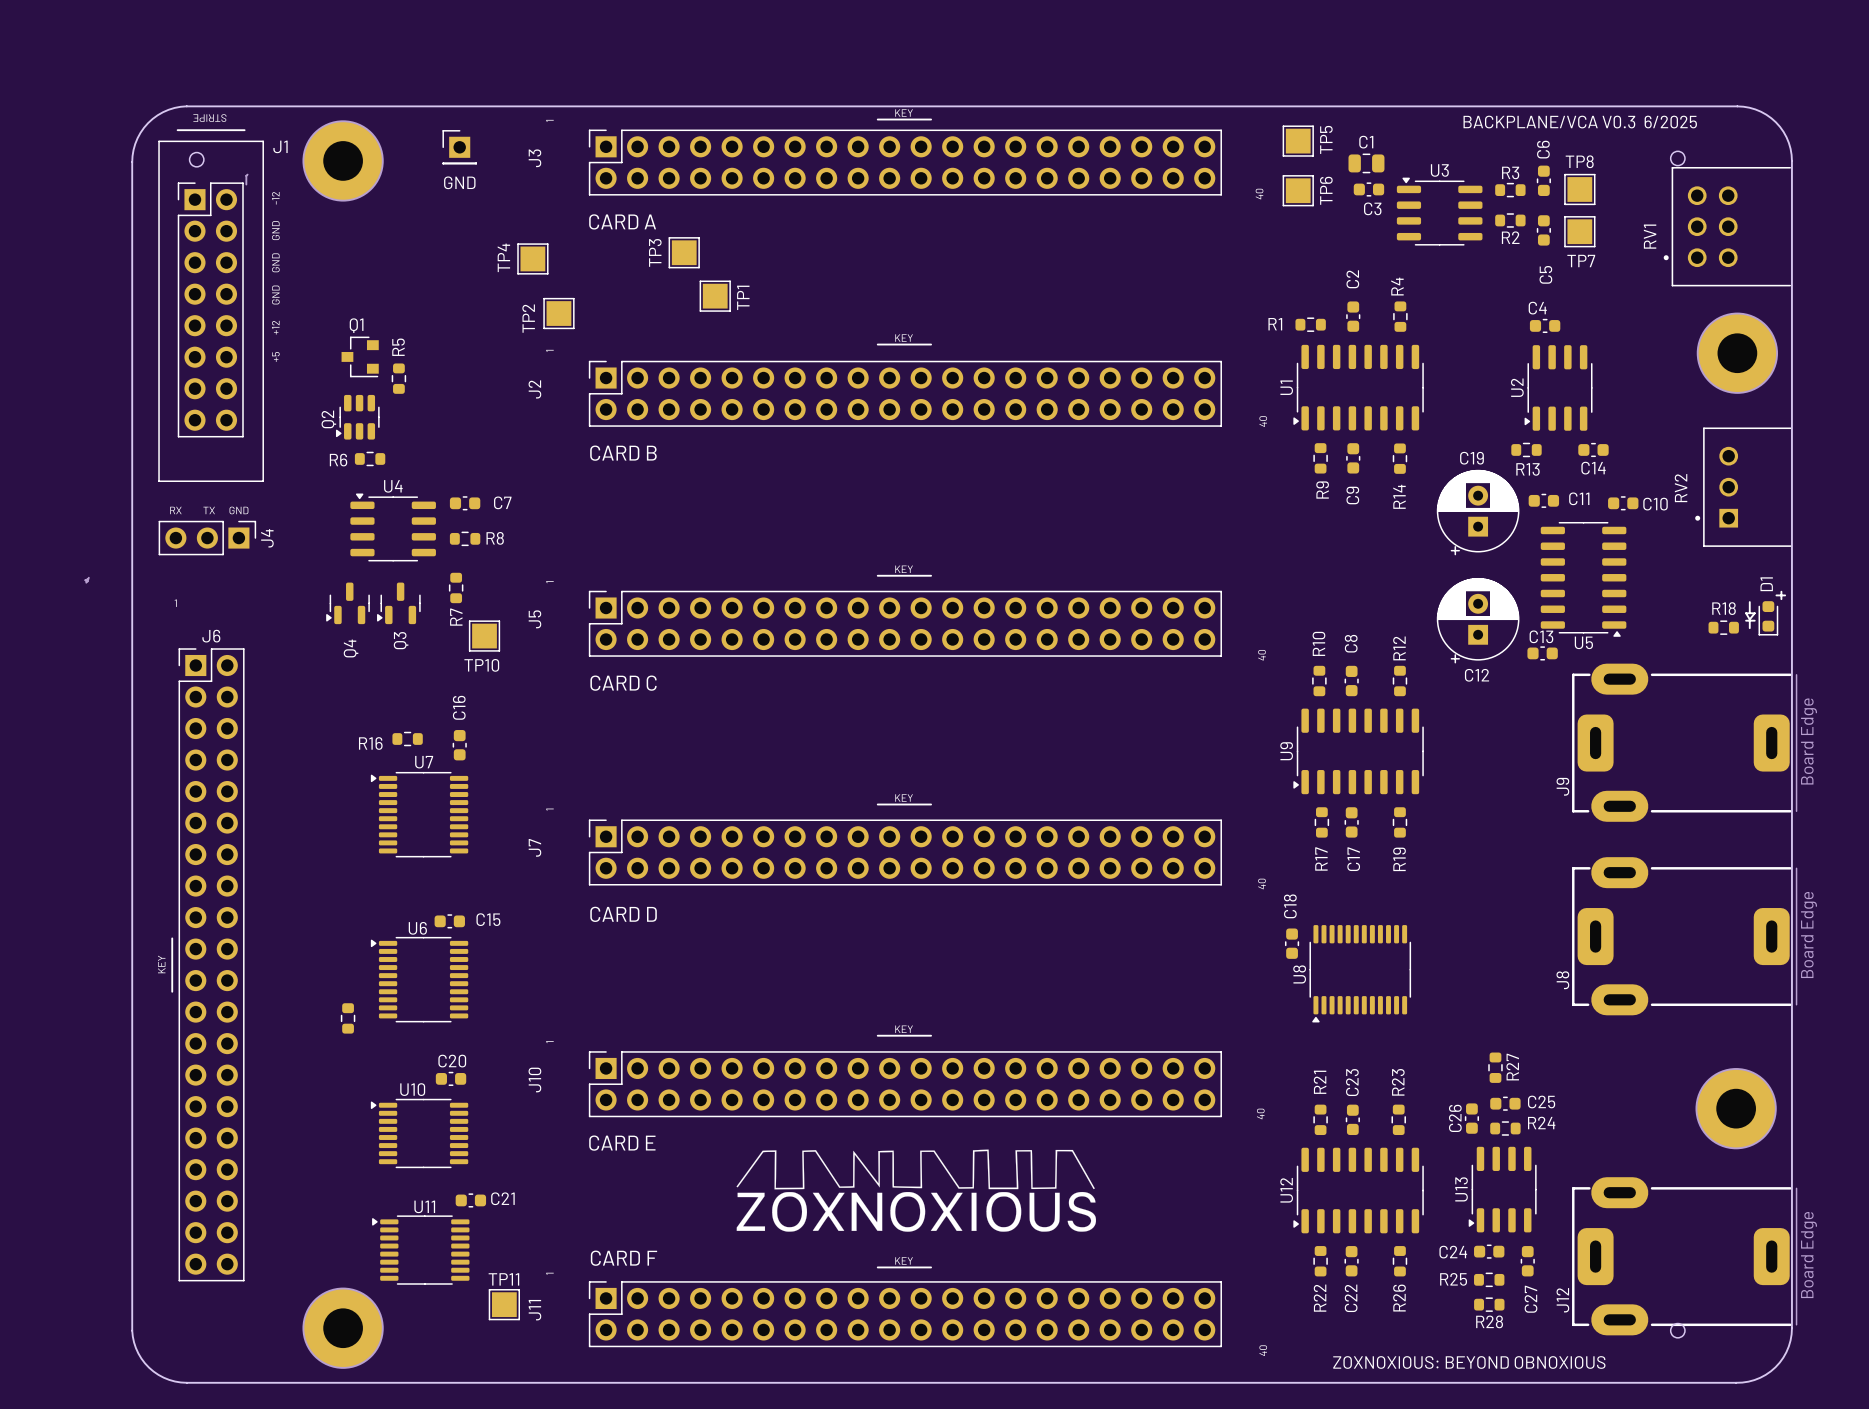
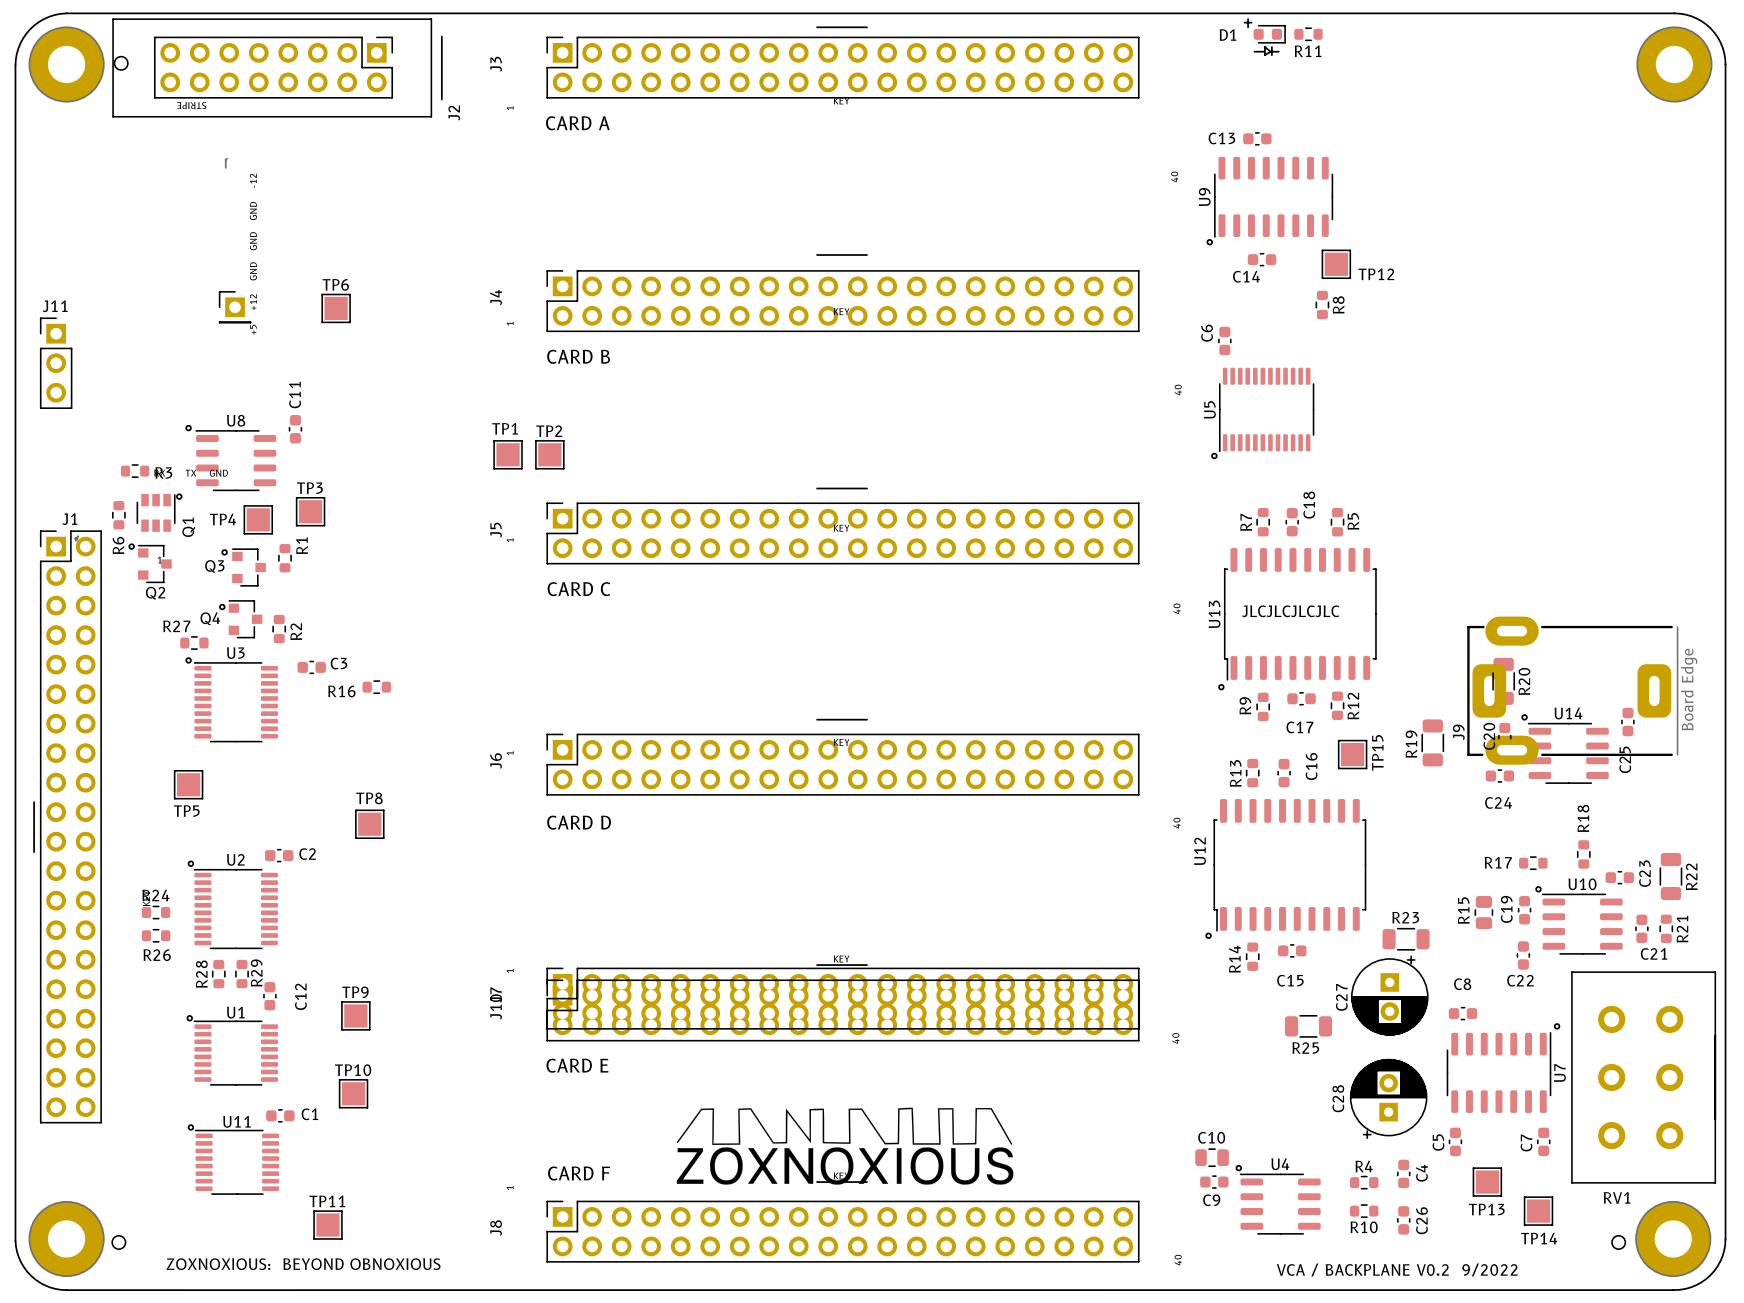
line: none -> (1248, 19) (1248, 27)
line: none -> (1244, 22) (1251, 22)
R11: none -> (1308, 34)
line: none -> (441, 36) (441, 99)
line: none -> (1264, 47) (1264, 55) (1270, 51) (1264, 47)
line: none -> (1271, 47) (1271, 55)
line: none -> (1254, 51) (1263, 51)
line: none -> (1271, 51) (1278, 51)
board edge: (186, 106) (1737, 106) (1755, 109) (1771, 118) (1786, 137) (1791, 160) (1791, 1328) (1788, 1346) (1779, 1362) (1760, 1377) (1736, 1382) (186, 1382) (169, 1379) (153, 1371) (138, 1353) (132, 1330) (132, 162) (135, 143) (148, 123) (168, 109) (186, 106) -> (66, 13) (49, 16) (30, 29) (18, 48) (15, 65) (15, 1241) (21, 1262) (35, 1279) (50, 1287) (66, 1290) (1673, 1290) (1695, 1285) (1714, 1271) (1722, 1256) (1725, 1238) (1725, 64) (1720, 42) (1706, 24) (1691, 16) (1674, 13) (66, 13)
line: (877, 119) (931, 119) -> (817, 27) (867, 27)
text: BACKPLANE/VCA V0.3 6/2025 (1580, 122) -> none
line: (177, 130) (244, 130) -> none
TP5 name rotation: 0° (1326, 139) -> 90° clockwise (186, 811)
TP5 name position: TP5 (1326, 139) -> TP5 (186, 811)
J1 footprint: [158, 140, 264, 482] -> [40, 530, 102, 1124]
TP5 position: (1298, 141) -> (188, 784)
C1 name position: C1 (1366, 142) -> C1 (309, 1114)
J1 name position: J1 (280, 146) -> J1 (69, 519)
part position: (459, 147) -> (235, 307)
C6 name position: C6 (1543, 149) -> C6 (1207, 333)
round board edge: [1670, 151, 1686, 166] -> none
C1 footprint: [1348, 153, 1385, 174] -> [266, 1109, 295, 1123]
round board edge position: (196, 159) -> (121, 63)
part position: (343, 160) -> (66, 64)
J3 position: (905, 162) -> (842, 67)
RV1 footprint: [1663, 166, 1792, 287] -> [1571, 971, 1717, 1184]
R3 name position: R3 (1510, 172) -> R3 (163, 473)
U3 footprint: [1396, 177, 1483, 246] -> [193, 662, 279, 743]
C6 position: (1543, 180) -> (1224, 340)
text: GND (459, 182) -> none
C3 position: (1368, 189) -> (311, 667)
TP8 position: (1579, 189) -> (369, 824)
TP6 position: (1298, 190) -> (336, 308)
TP6 name rotation: 0° (1326, 190) -> 90° clockwise (335, 284)
R3 position: (1510, 190) -> (135, 471)
C3 name position: C3 (1372, 208) -> C3 (339, 663)
R2 rotation: 0° (1510, 220) -> 90° clockwise (279, 629)
R2 position: (1510, 220) -> (279, 629)
text position: CARD A (622, 221) -> CARD A (577, 123)
C5 position: (1543, 230) -> (1455, 1141)
TP7: (1579, 231) -> none
RV1 name position: RV1 (1650, 236) -> RV1 (1617, 1197)
TP3 name rotation: 0° (655, 252) -> 90° clockwise (309, 488)
TP3 position: (684, 252) -> (310, 511)
TP4 name rotation: 0° (503, 257) -> 90° clockwise (222, 519)
TP4 position: (532, 258) -> (258, 519)
drawing: none -> [1206, 239, 1213, 246]
C5 name position: C5 (1545, 274) -> C5 (1438, 1142)
TP12: none -> (1336, 264)
TP1 position: (715, 296) -> (508, 454)
TP1 name rotation: 0° (743, 297) -> 90° clockwise (505, 428)
TP1 name position: TP1 (743, 297) -> TP1 (505, 428)
TP2 position: (558, 313) -> (549, 454)
C2 rotation: 0° (1353, 316) -> 90° clockwise (279, 855)
C2 position: (1353, 316) -> (279, 855)
R4 rotation: 0° (1400, 316) -> 90° clockwise (1364, 1182)
R4 position: (1400, 316) -> (1364, 1182)
TP2 name rotation: 0° (528, 318) -> 90° clockwise (549, 431)
TP2 name position: TP2 (528, 318) -> TP2 (549, 431)
R1 name position: R1 (1275, 324) -> R1 (301, 545)
R1 rotation: 0° (1310, 324) -> 90° clockwise (285, 558)
R1 position: (1310, 324) -> (285, 558)
Q1 name position: Q1 (356, 325) -> Q1 (188, 527)
C4 rotation: 0° (1545, 325) -> 90° clockwise (1403, 1173)
C4 position: (1545, 325) -> (1403, 1173)
Q1 footprint: [341, 336, 379, 378] -> [136, 493, 176, 532]
line: (877, 344) (931, 344) -> (817, 255) (867, 255)
U1 footprint: [1293, 344, 1424, 431] -> [193, 1020, 279, 1086]
U2 footprint: [1524, 345, 1593, 431] -> [193, 869, 279, 950]
R5 name position: R5 (398, 347) -> R5 (1353, 521)
part position: (1737, 353) -> (1674, 64)
J2 footprint: [588, 360, 1222, 427] -> [112, 18, 433, 118]
R5 position: (398, 378) -> (1337, 522)
U1 name position: U1 (1286, 387) -> U1 (235, 1012)
U2 name position: U2 (1517, 387) -> U2 (235, 859)
J2 name position: J2 (534, 389) -> J2 (454, 113)
Q2 footprint: [335, 394, 380, 440] -> [137, 544, 172, 584]
Q2 name position: Q2 (328, 419) -> Q2 (155, 593)
R13 rotation: 0° (1526, 449) -> 90° clockwise (1252, 773)
R13 position: (1526, 449) -> (1252, 773)
C14 position: (1593, 449) -> (1262, 259)
text position: CARD B (623, 453) -> CARD B (578, 356)
drawing: none -> [185, 424, 192, 432]
R6 rotation: 0° (370, 458) -> 90° clockwise (118, 515)
R6 position: (370, 458) -> (118, 515)
R9 position: (1320, 458) -> (1263, 706)
C9 rotation: 0° (1353, 458) -> 90° clockwise (1214, 1182)
C9 position: (1353, 458) -> (1214, 1182)
R14 position: (1399, 458) -> (1252, 956)
C19 name position: C19 (1471, 458) -> C19 (1506, 909)
R6 name position: R6 (338, 460) -> R6 (118, 545)
C14 name position: C14 (1593, 468) -> C14 (1246, 276)
C19 footprint: [1436, 469, 1520, 556] -> [1517, 895, 1532, 925]
RV2: (1743, 487) -> none
drawing: none -> [1211, 452, 1218, 460]
R9 name position: R9 (1322, 490) -> R9 (1245, 705)
U4 footprint: [350, 493, 436, 562] -> [1239, 1173, 1321, 1235]
R14 name position: R14 (1399, 496) -> R14 (1234, 959)
C10 footprint: [1608, 496, 1639, 511] -> [1195, 1148, 1229, 1167]
C11 name position: C11 (1579, 498) -> C11 (295, 395)
C11 rotation: 0° (1543, 500) -> 90° clockwise (295, 429)
C11 position: (1543, 500) -> (295, 429)
C7 name position: C7 (502, 502) -> C7 (1526, 1142)
C7 rotation: 0° (465, 503) -> 90° clockwise (1543, 1141)
C7 position: (465, 503) -> (1543, 1141)
C10 name position: C10 (1655, 504) -> C10 (1211, 1137)
J4 footprint: [158, 520, 257, 556] -> [546, 270, 1140, 333]
U5 footprint: [1540, 521, 1627, 637] -> [1219, 367, 1315, 453]
drawing: none -> [176, 493, 183, 500]
J4 name position: J4 (267, 538) -> J4 (496, 297)
R8 rotation: 0° (465, 538) -> 90° clockwise (1322, 304)
R8 position: (465, 538) -> (1322, 304)
line: (877, 575) (931, 575) -> (817, 488) (867, 488)
C12 footprint: [1436, 577, 1520, 664] -> [263, 981, 277, 1011]
Q4 footprint: [326, 582, 370, 625] -> [228, 600, 263, 639]
Q3 footprint: [377, 582, 421, 625] -> [232, 548, 266, 587]
drawing: none -> [128, 543, 135, 550]
R7 position: (456, 587) -> (1263, 522)
drawing: none -> [221, 549, 228, 556]
line: (1781, 591) (1781, 599) -> none
line: (1776, 595) (1785, 595) -> none
line: (1749, 602) (1749, 612) -> none
line: (1746, 613) (1749, 619) (1754, 613) (1746, 613) -> none
R7 name position: R7 (456, 617) -> R7 (1246, 522)
D1 rotation: 0° (1768, 618) -> 90° counterclockwise (1269, 34)
D1 position: (1768, 618) -> (1269, 34)
line: (1746, 620) (1754, 620) -> none
line: (1749, 620) (1749, 628) -> none
J5 position: (905, 623) -> (842, 533)
R18 rotation: 0° (1723, 627) -> 90° clockwise (1583, 854)
R18 position: (1723, 627) -> (1583, 854)
J6 name position: J6 (211, 636) -> J6 (496, 761)
TP10 position: (484, 636) -> (353, 1093)
C13 name position: C13 (1541, 636) -> C13 (1221, 138)
Q3 name position: Q3 (401, 640) -> Q3 (214, 566)
U5 name position: U5 (1583, 642) -> U5 (1209, 409)
R10 name position: R10 (1318, 643) -> R10 (1364, 1227)
J6 footprint: [178, 648, 245, 1282] -> [546, 733, 1140, 796]
Q4 name position: Q4 (351, 648) -> Q4 (210, 618)
R12 name position: R12 (1399, 648) -> R12 (1353, 706)
drawing: none -> [219, 603, 226, 611]
C13 position: (1542, 653) -> (1257, 138)
text: none -> JLCJLCJLCJLC (1290, 611)
TP10 name position: TP10 (481, 665) -> TP10 (353, 1070)
C12 name position: C12 (1477, 675) -> C12 (300, 996)
R10 rotation: 0° (1319, 681) -> 90° clockwise (1364, 1211)
R10 position: (1319, 681) -> (1364, 1211)
C8 rotation: 0° (1351, 681) -> 90° clockwise (1462, 1013)
C8 position: (1351, 681) -> (1462, 1013)
R12 position: (1399, 681) -> (1337, 705)
text position: CARD C (623, 683) -> CARD C (578, 589)
drawing: none -> [185, 657, 192, 664]
C16 name position: C16 (459, 707) -> C16 (1311, 766)
U9 footprint: [1293, 708, 1424, 795] -> [1214, 156, 1334, 238]
R20: none -> (1503, 681)
drawing: none -> [1218, 683, 1225, 691]
C16 position: (459, 745) -> (1284, 773)
U7 name position: U7 (424, 762) -> U7 (1559, 1073)
drawing: none -> [1521, 714, 1528, 721]
U7 footprint: [370, 771, 469, 858] -> [1446, 1032, 1552, 1113]
line: (877, 804) (931, 804) -> (817, 719) (867, 719)
R19 footprint: [1392, 807, 1408, 838] -> [1421, 719, 1445, 767]
U14: none -> (1568, 753)
TP15: none -> (1352, 754)
R17 rotation: 0° (1321, 822) -> 90° clockwise (1533, 863)
R17 position: (1321, 822) -> (1533, 863)
C17 rotation: 0° (1351, 822) -> 90° clockwise (1301, 698)
C17 position: (1351, 822) -> (1301, 698)
J7 position: (905, 852) -> (842, 998)
J8 footprint: [1572, 857, 1798, 1016] -> [546, 1200, 1140, 1263]
R19 name position: R19 (1399, 859) -> R19 (1411, 744)
C18 name position: C18 (1290, 906) -> C18 (1309, 505)
text position: CARD D (623, 914) -> CARD D (579, 822)
C15 name position: C15 (488, 919) -> C15 (1290, 980)
C15 position: (449, 921) -> (1292, 950)
drawing: none -> [187, 860, 195, 867]
U8 footprint: [1309, 925, 1412, 1023] -> [195, 430, 277, 492]
line: (172, 938) (172, 991) -> (34, 802) (34, 852)
C18 position: (1292, 943) -> (1292, 522)
drawing: none -> [1535, 886, 1542, 893]
U8 name position: U8 (1299, 974) -> U8 (236, 420)
U6: (419, 979) -> none
R15: none -> (1483, 912)
J8 name position: J8 (1562, 980) -> J8 (496, 1228)
drawing: none -> [1205, 932, 1212, 939]
part: (348, 1018) -> none
R29: none -> (242, 974)
R27 rotation: 0° (1495, 1067) -> 90° clockwise (194, 643)
R27 position: (1495, 1067) -> (194, 643)
R27 name position: R27 (1512, 1067) -> R27 (176, 626)
C20 rotation: 0° (451, 1078) -> 90° clockwise (1504, 737)
C20 position: (451, 1078) -> (1504, 737)
R21 name position: R21 (1320, 1082) -> R21 (1682, 929)
drawing: none -> [186, 1015, 193, 1022]
TP9: none -> (355, 1015)
drawing: none -> [1553, 1023, 1561, 1030]
U10 footprint: [370, 1098, 469, 1169] -> [1541, 893, 1623, 955]
C25 rotation: 0° (1505, 1103) -> 90° clockwise (1627, 722)
C25 position: (1505, 1103) -> (1627, 722)
R23 footprint: [1391, 1104, 1406, 1136] -> [1382, 927, 1430, 951]
part position: (1736, 1108) -> (1673, 1238)
C26 name position: C26 (1455, 1118) -> C26 (1421, 1220)
C26 position: (1471, 1118) -> (1403, 1220)
R21 position: (1320, 1119) -> (1666, 928)
C23 rotation: 0° (1352, 1119) -> 90° clockwise (1619, 877)
C23 position: (1352, 1119) -> (1619, 877)
R24 name position: R24 (1541, 1123) -> R24 (155, 895)
R24 position: (1505, 1128) -> (156, 912)
U13 footprint: [1468, 1146, 1537, 1233] -> [1224, 548, 1377, 681]
U12 footprint: [1293, 1147, 1424, 1234] -> [1213, 798, 1367, 932]
C28: none -> (1388, 1098)
U13 name position: U13 (1461, 1189) -> U13 (1214, 614)
drawing position: (916, 1190) -> (845, 1146)
U12 name position: U12 (1286, 1190) -> U12 (1200, 851)
C21 rotation: 0° (470, 1200) -> 90° clockwise (1641, 928)
C21 position: (470, 1200) -> (1641, 928)
drawing: none -> [187, 1124, 195, 1131]
U11 footprint: [372, 1215, 470, 1285] -> [194, 1129, 280, 1195]
R22 footprint: [1313, 1246, 1328, 1277] -> [1659, 852, 1683, 901]
C27 footprint: [1520, 1246, 1535, 1277] -> [1351, 955, 1429, 1036]
drawing: none -> [1235, 1164, 1242, 1172]
C24 position: (1489, 1251) -> (1499, 776)
C24 name position: C24 (1453, 1252) -> C24 (1498, 802)
J12: (1684, 1256) -> none
C22 position: (1351, 1261) -> (1523, 955)
R26 rotation: 0° (1399, 1261) -> 90° clockwise (156, 935)
R26 position: (1399, 1261) -> (156, 935)
TP13: none -> (1487, 1182)
R25 footprint: [1474, 1272, 1505, 1288] -> [1284, 1015, 1333, 1038]
R25 name position: R25 (1453, 1279) -> R25 (1305, 1048)
J11 footprint: [588, 1281, 1222, 1348] -> [40, 317, 73, 409]
R22 name position: R22 (1320, 1298) -> R22 (1691, 876)
C22 name rotation: 0° (1351, 1298) -> 90° clockwise (1520, 980)
TP14: none -> (1538, 1211)
C27 name position: C27 (1531, 1299) -> C27 (1341, 997)
TP11 position: (504, 1304) -> (327, 1225)
R28 rotation: 0° (1489, 1304) -> 90° clockwise (218, 974)
R28 position: (1489, 1304) -> (218, 974)
J11 name position: J11 (534, 1310) -> J11 (55, 306)
round board edge: none -> [111, 1235, 126, 1250]
part position: (343, 1328) -> (66, 1238)
round board edge position: (1677, 1330) -> (1618, 1242)
text: none -> ZOXNOXIOUS: BEYOND OBNOXIOUS (303, 1264)
text: none -> VCA / BACKPLANE V0.2 9/2022 (1397, 1269)
text: ZOXNOXIOUS: BEYOND OBNOXIOUS (1469, 1362) -> none

